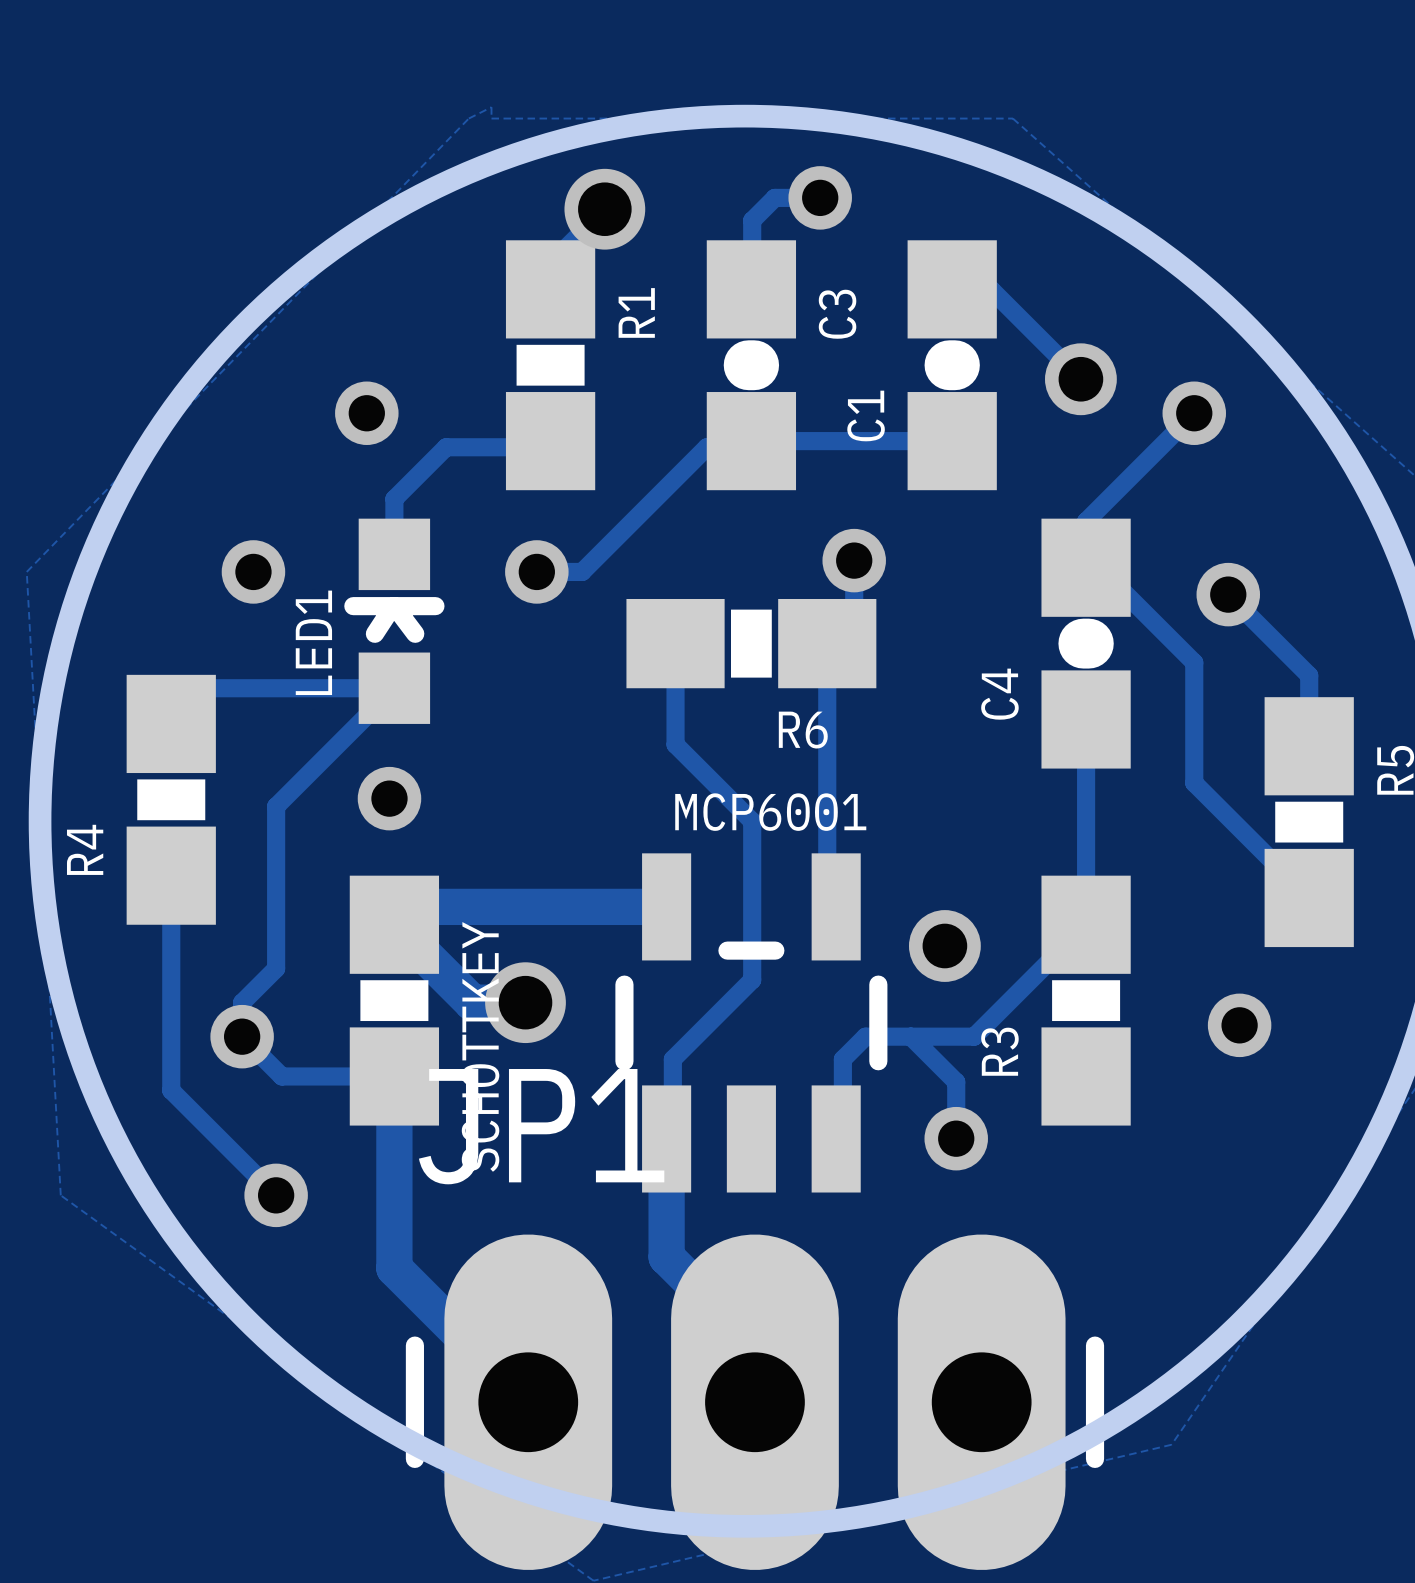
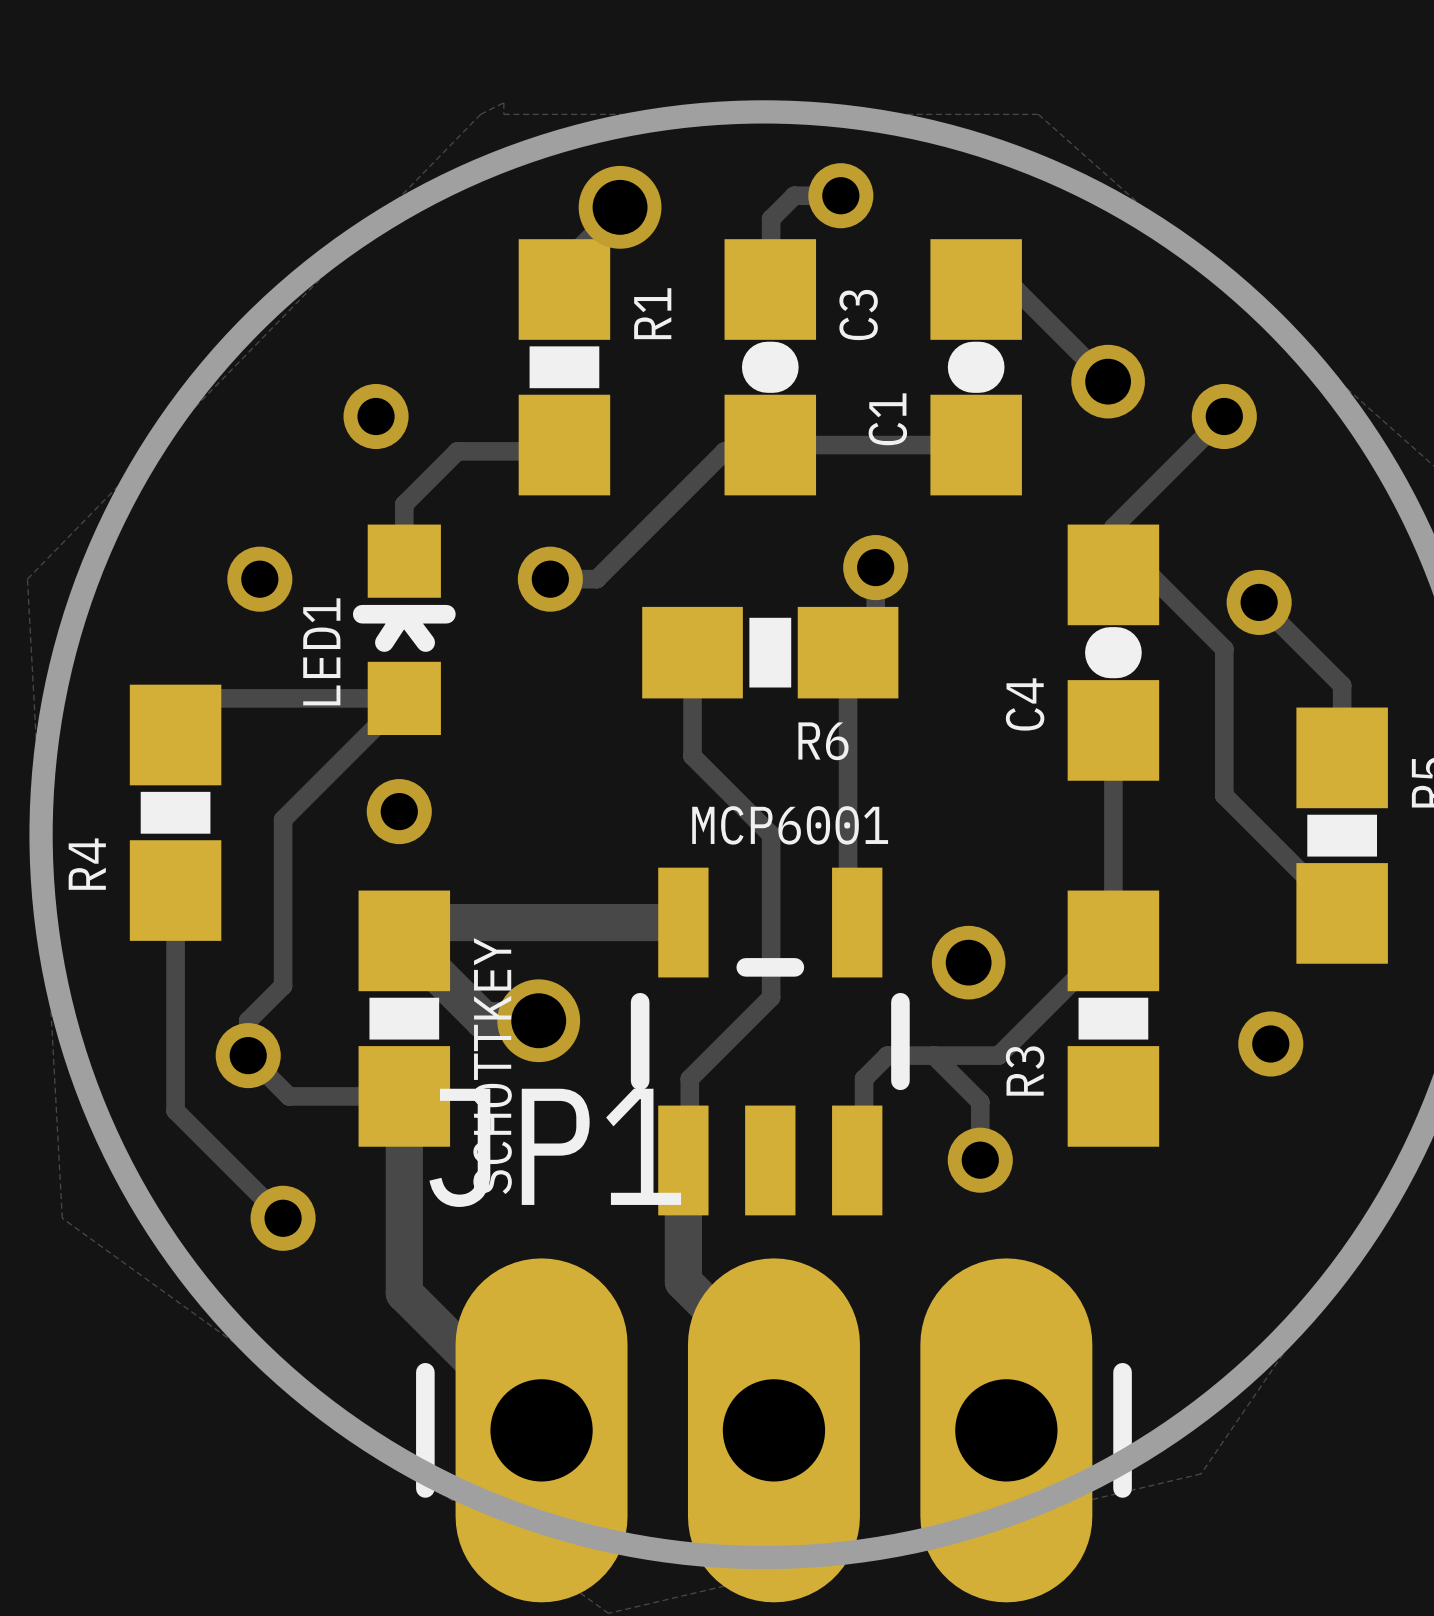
track: (1099, 567) (1194, 662) -> (1127, 574) (1150, 574) (1224, 648) (1224, 672)

